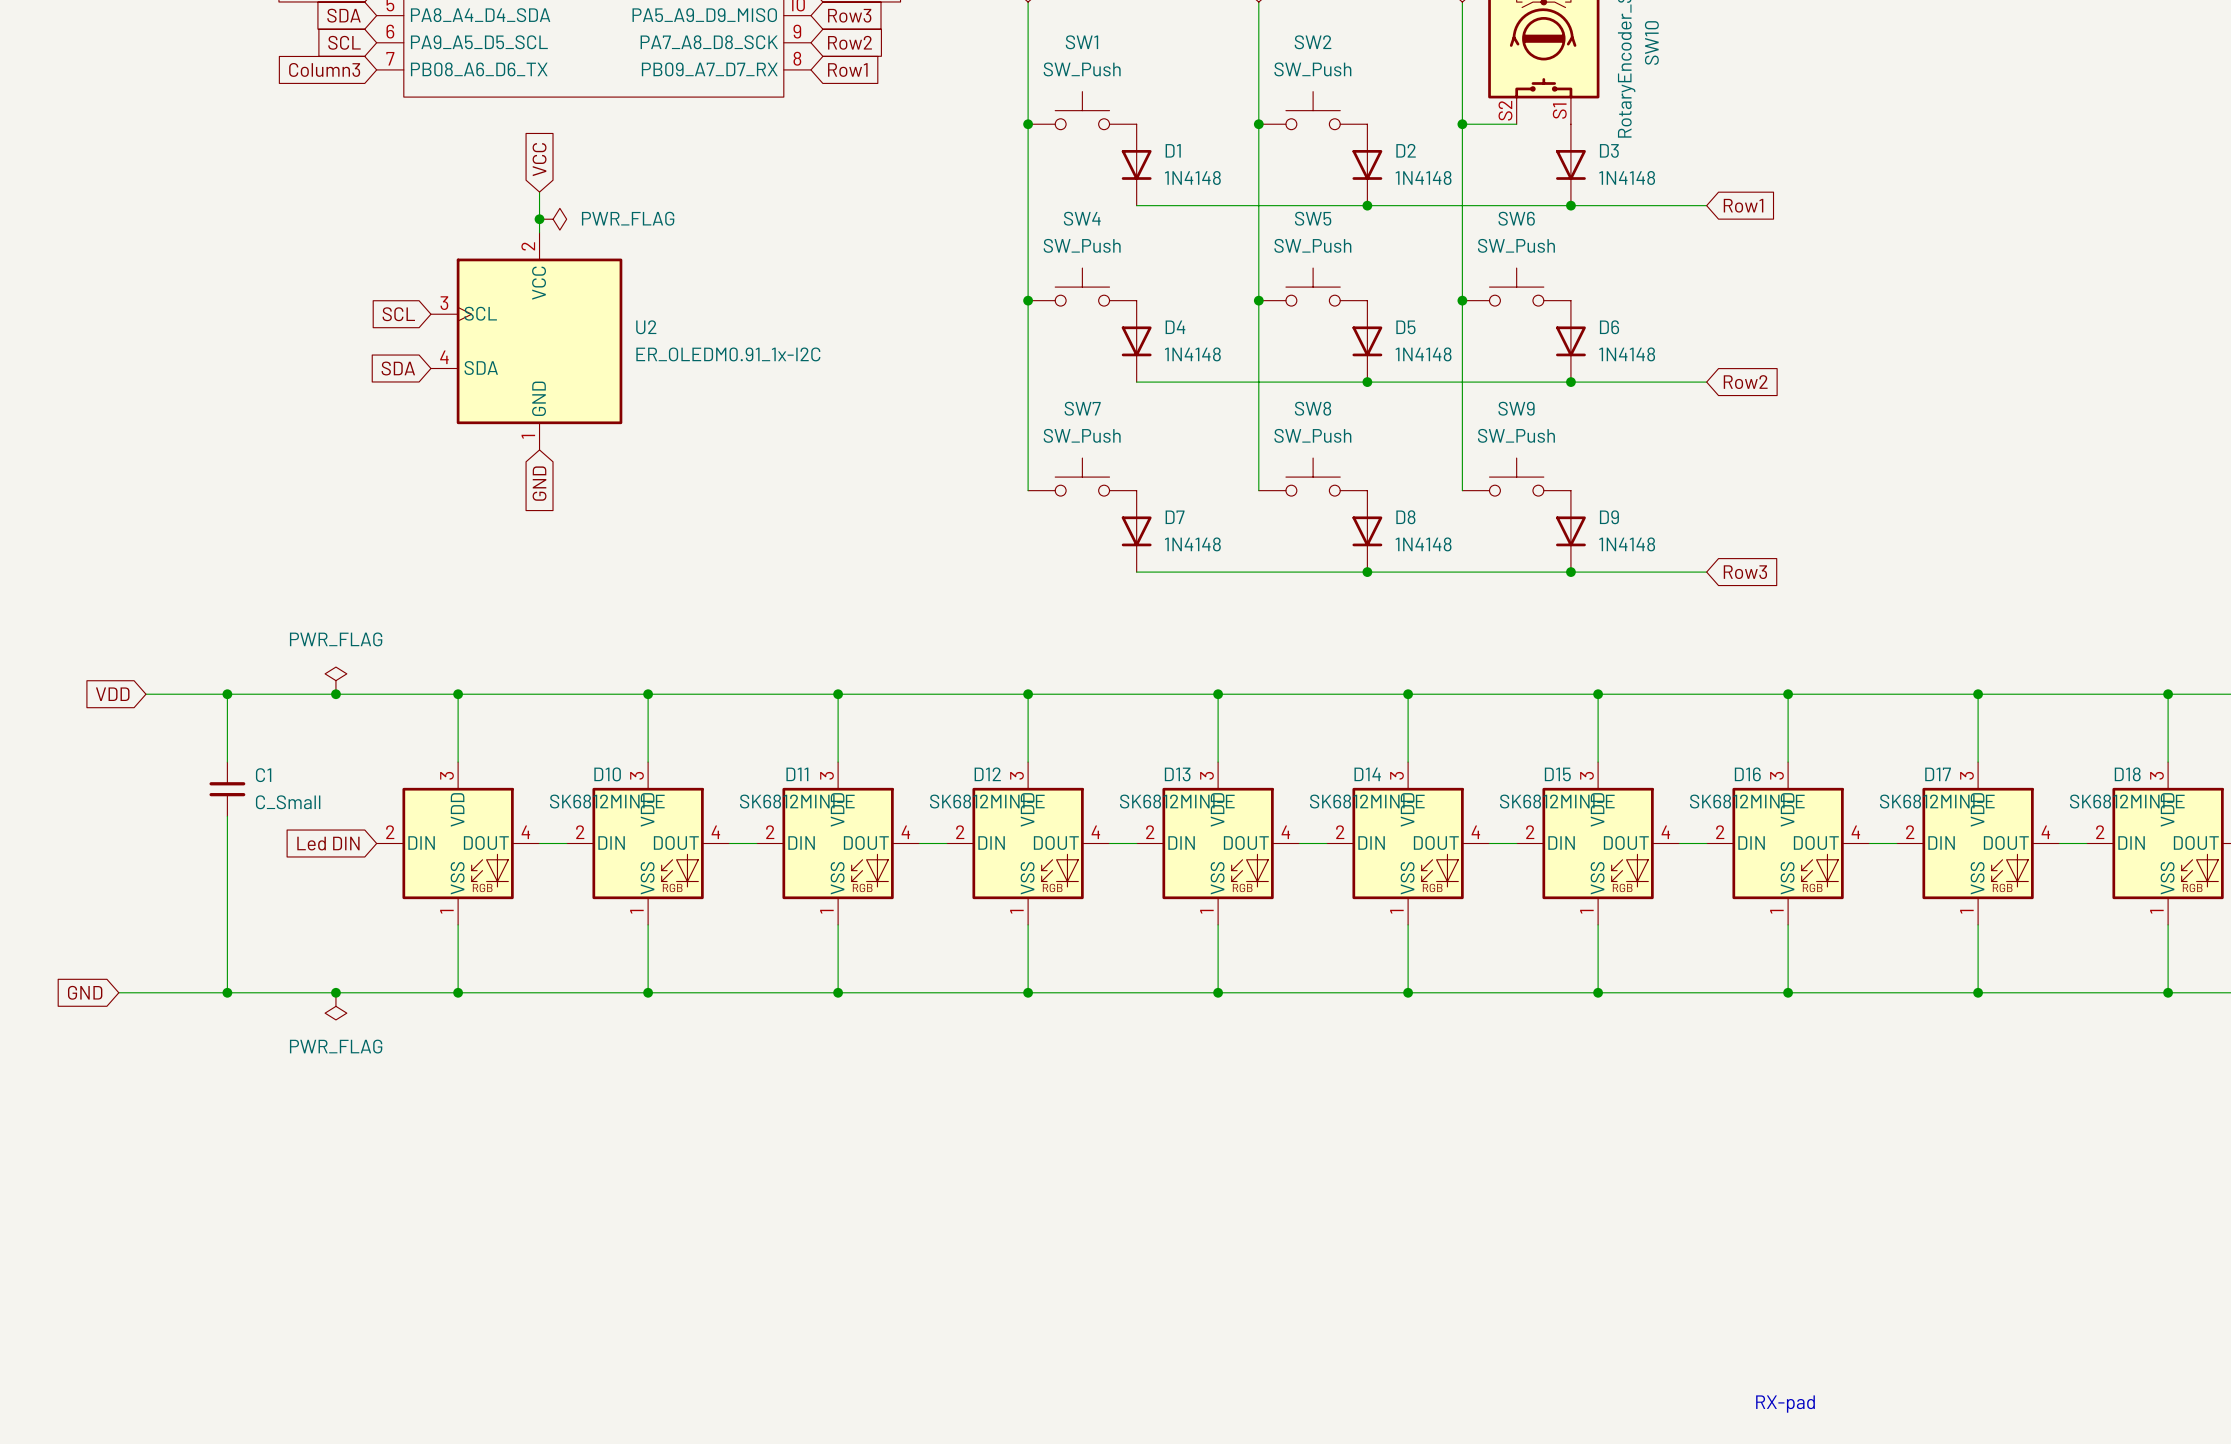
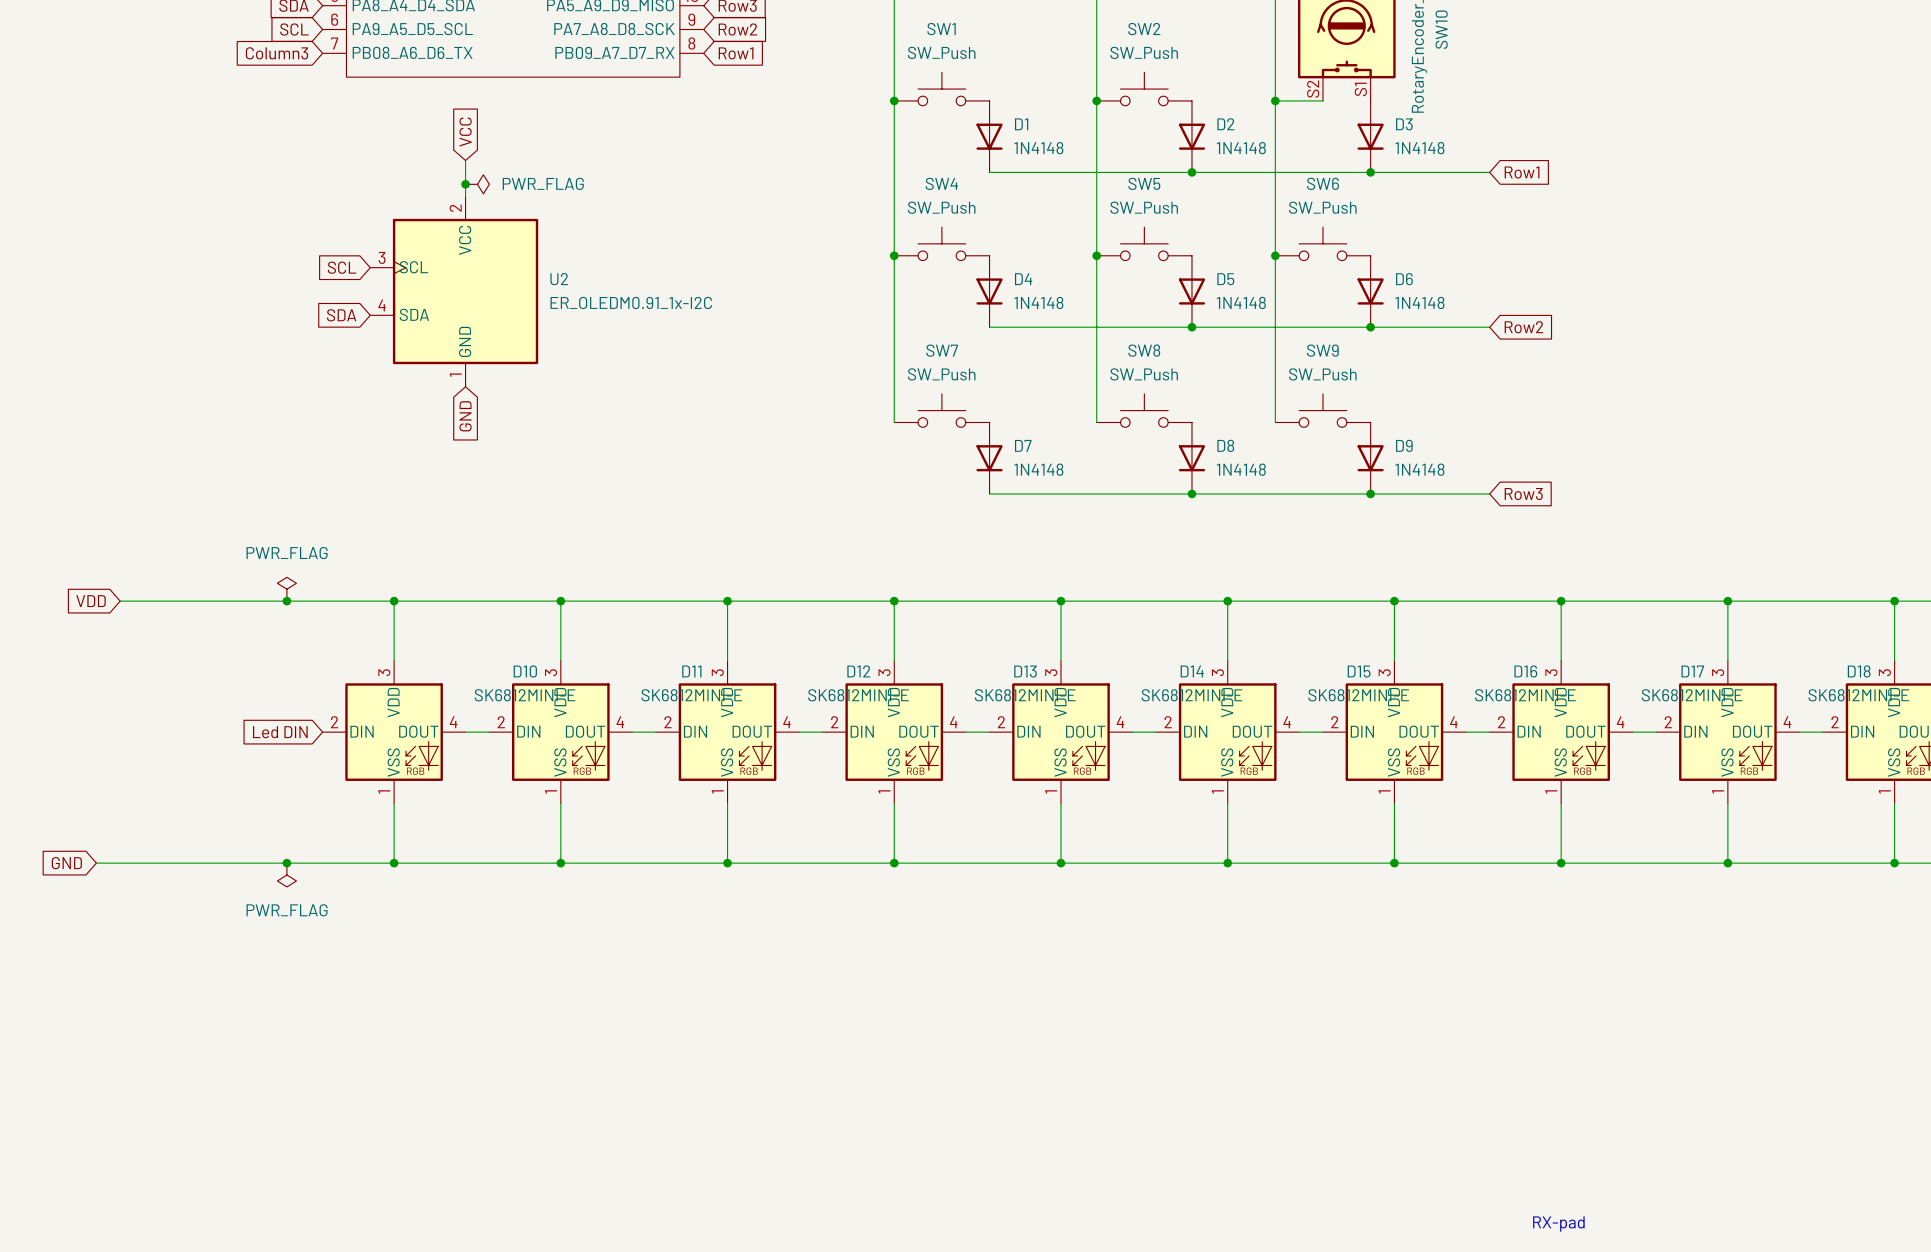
wire: (227, 694) (227, 762) -> none
junction: (227, 694) -> none
C1: C_Small (227, 789) -> none
wire: (227, 816) (227, 992) -> none
junction: (227, 992) -> none

